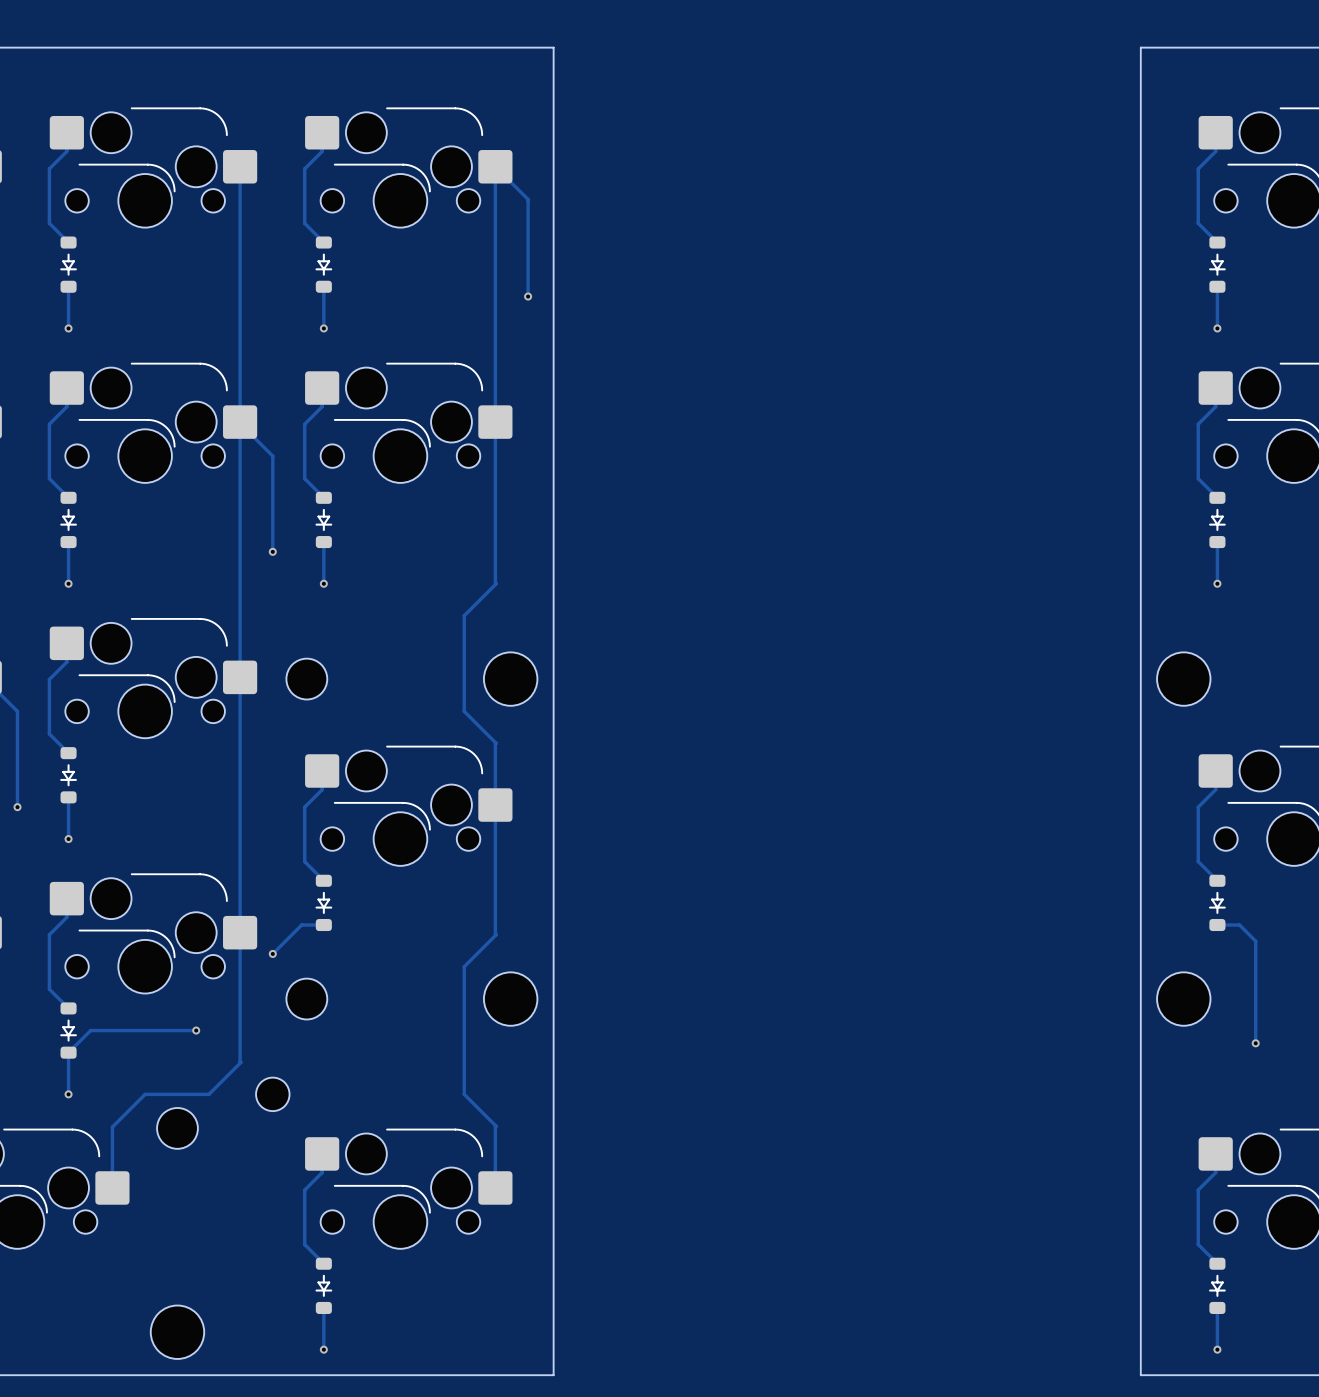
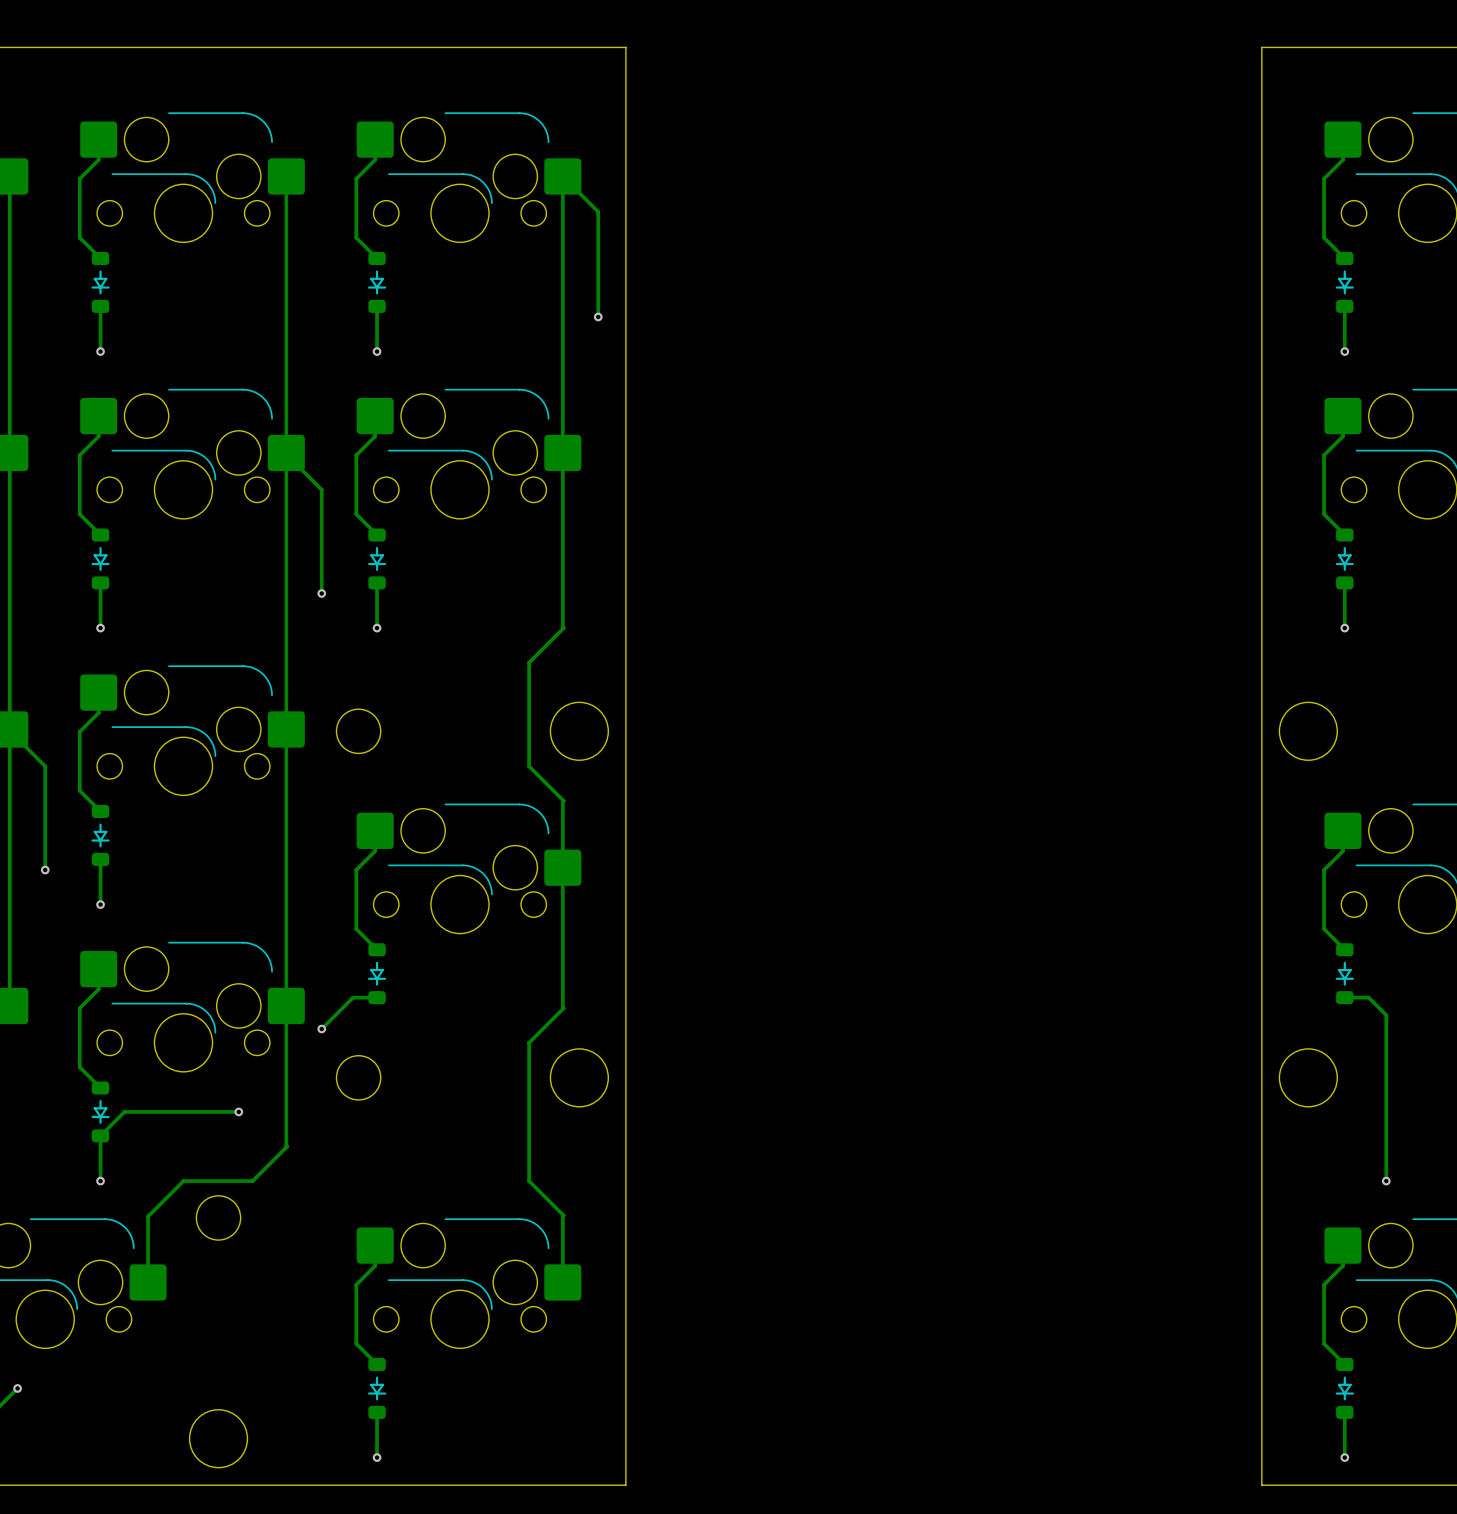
track: none -> (1386, 1125) (1386, 1181)
via position: (1255, 1043) -> (1386, 1181)
part: (272, 1094) -> none

